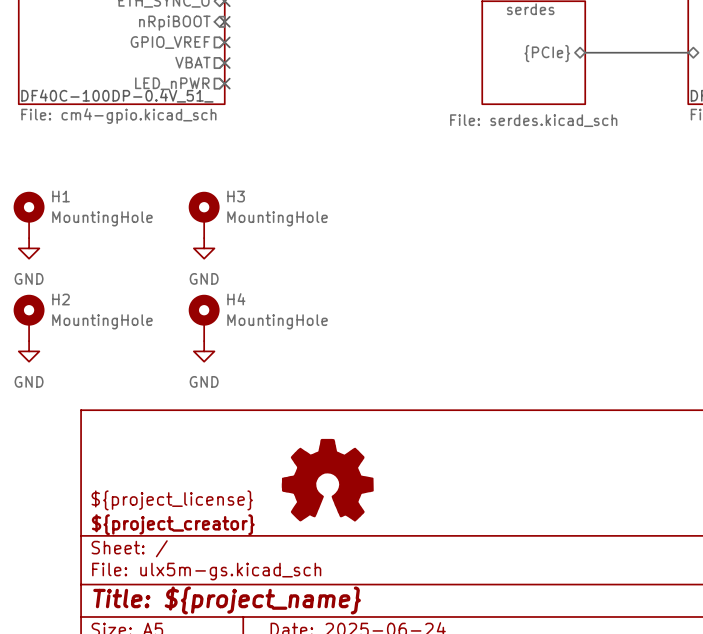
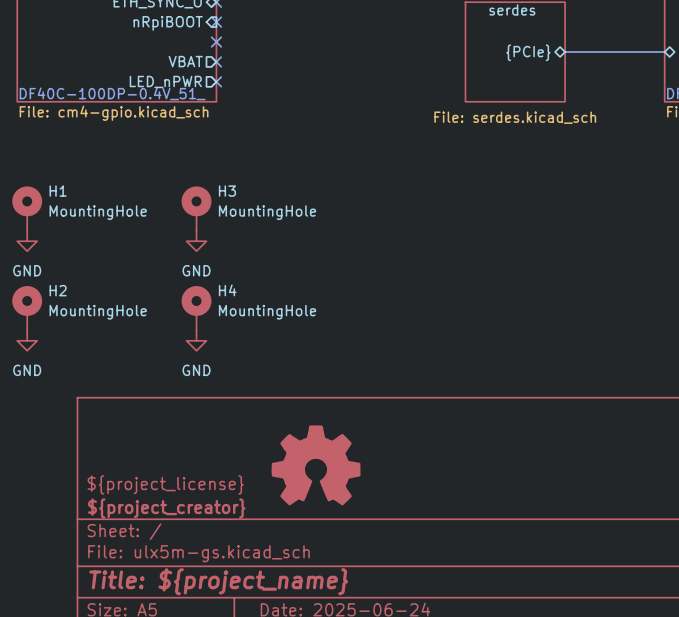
sheet pin: GPIO_VREF (170, 42) -> none

